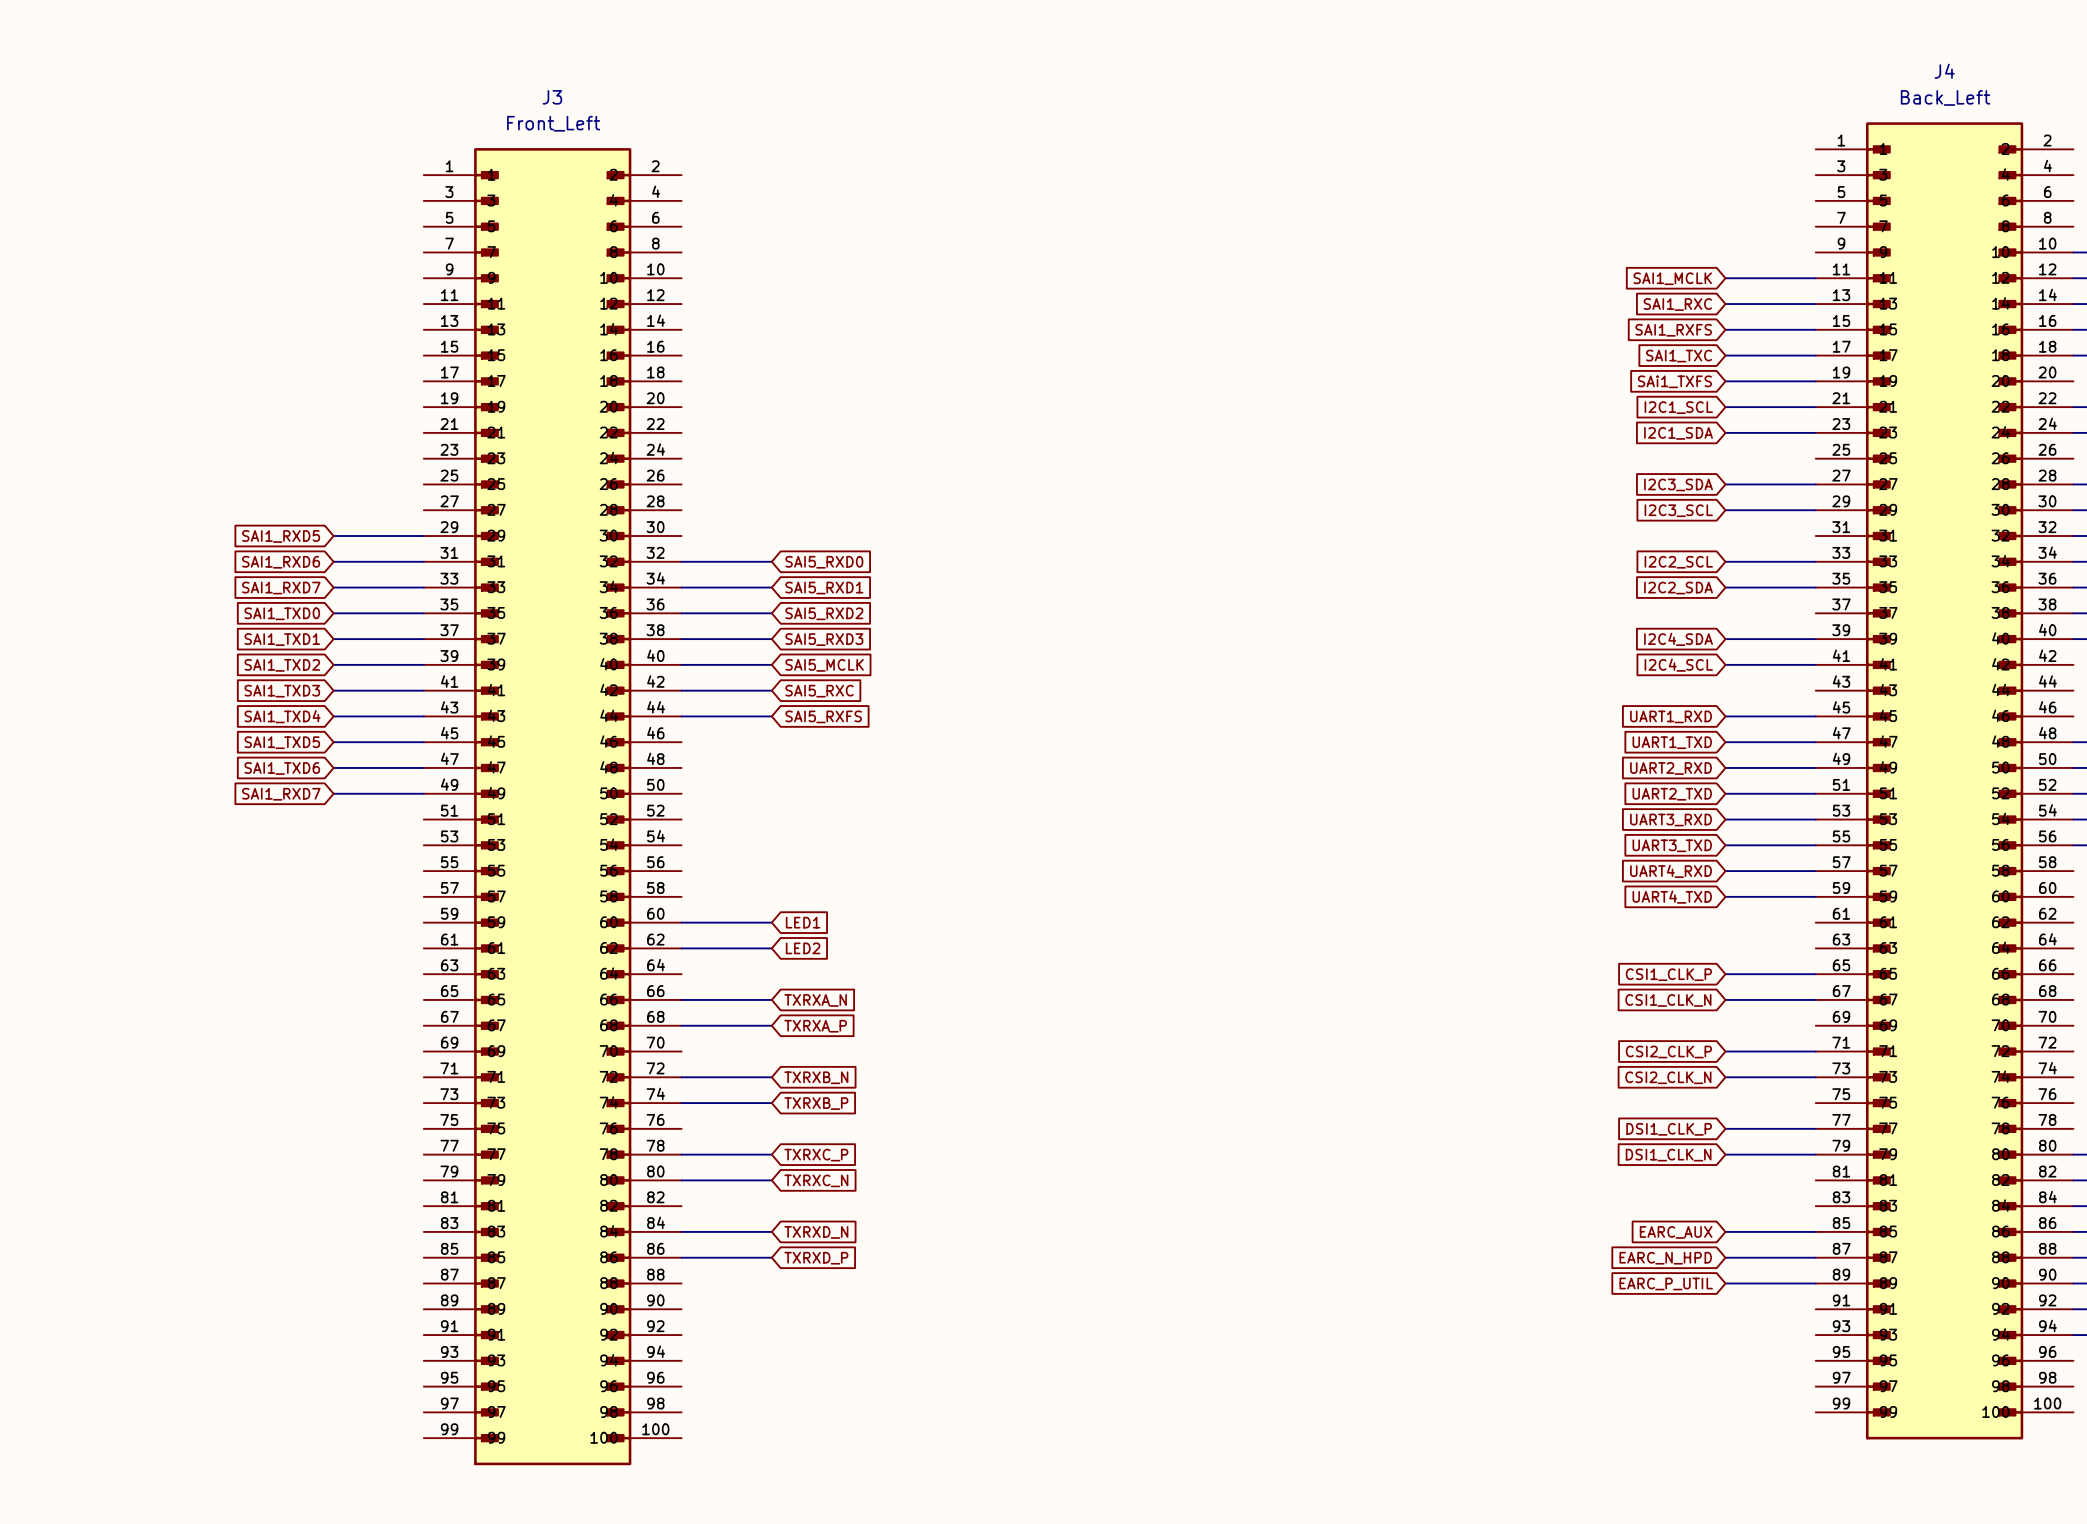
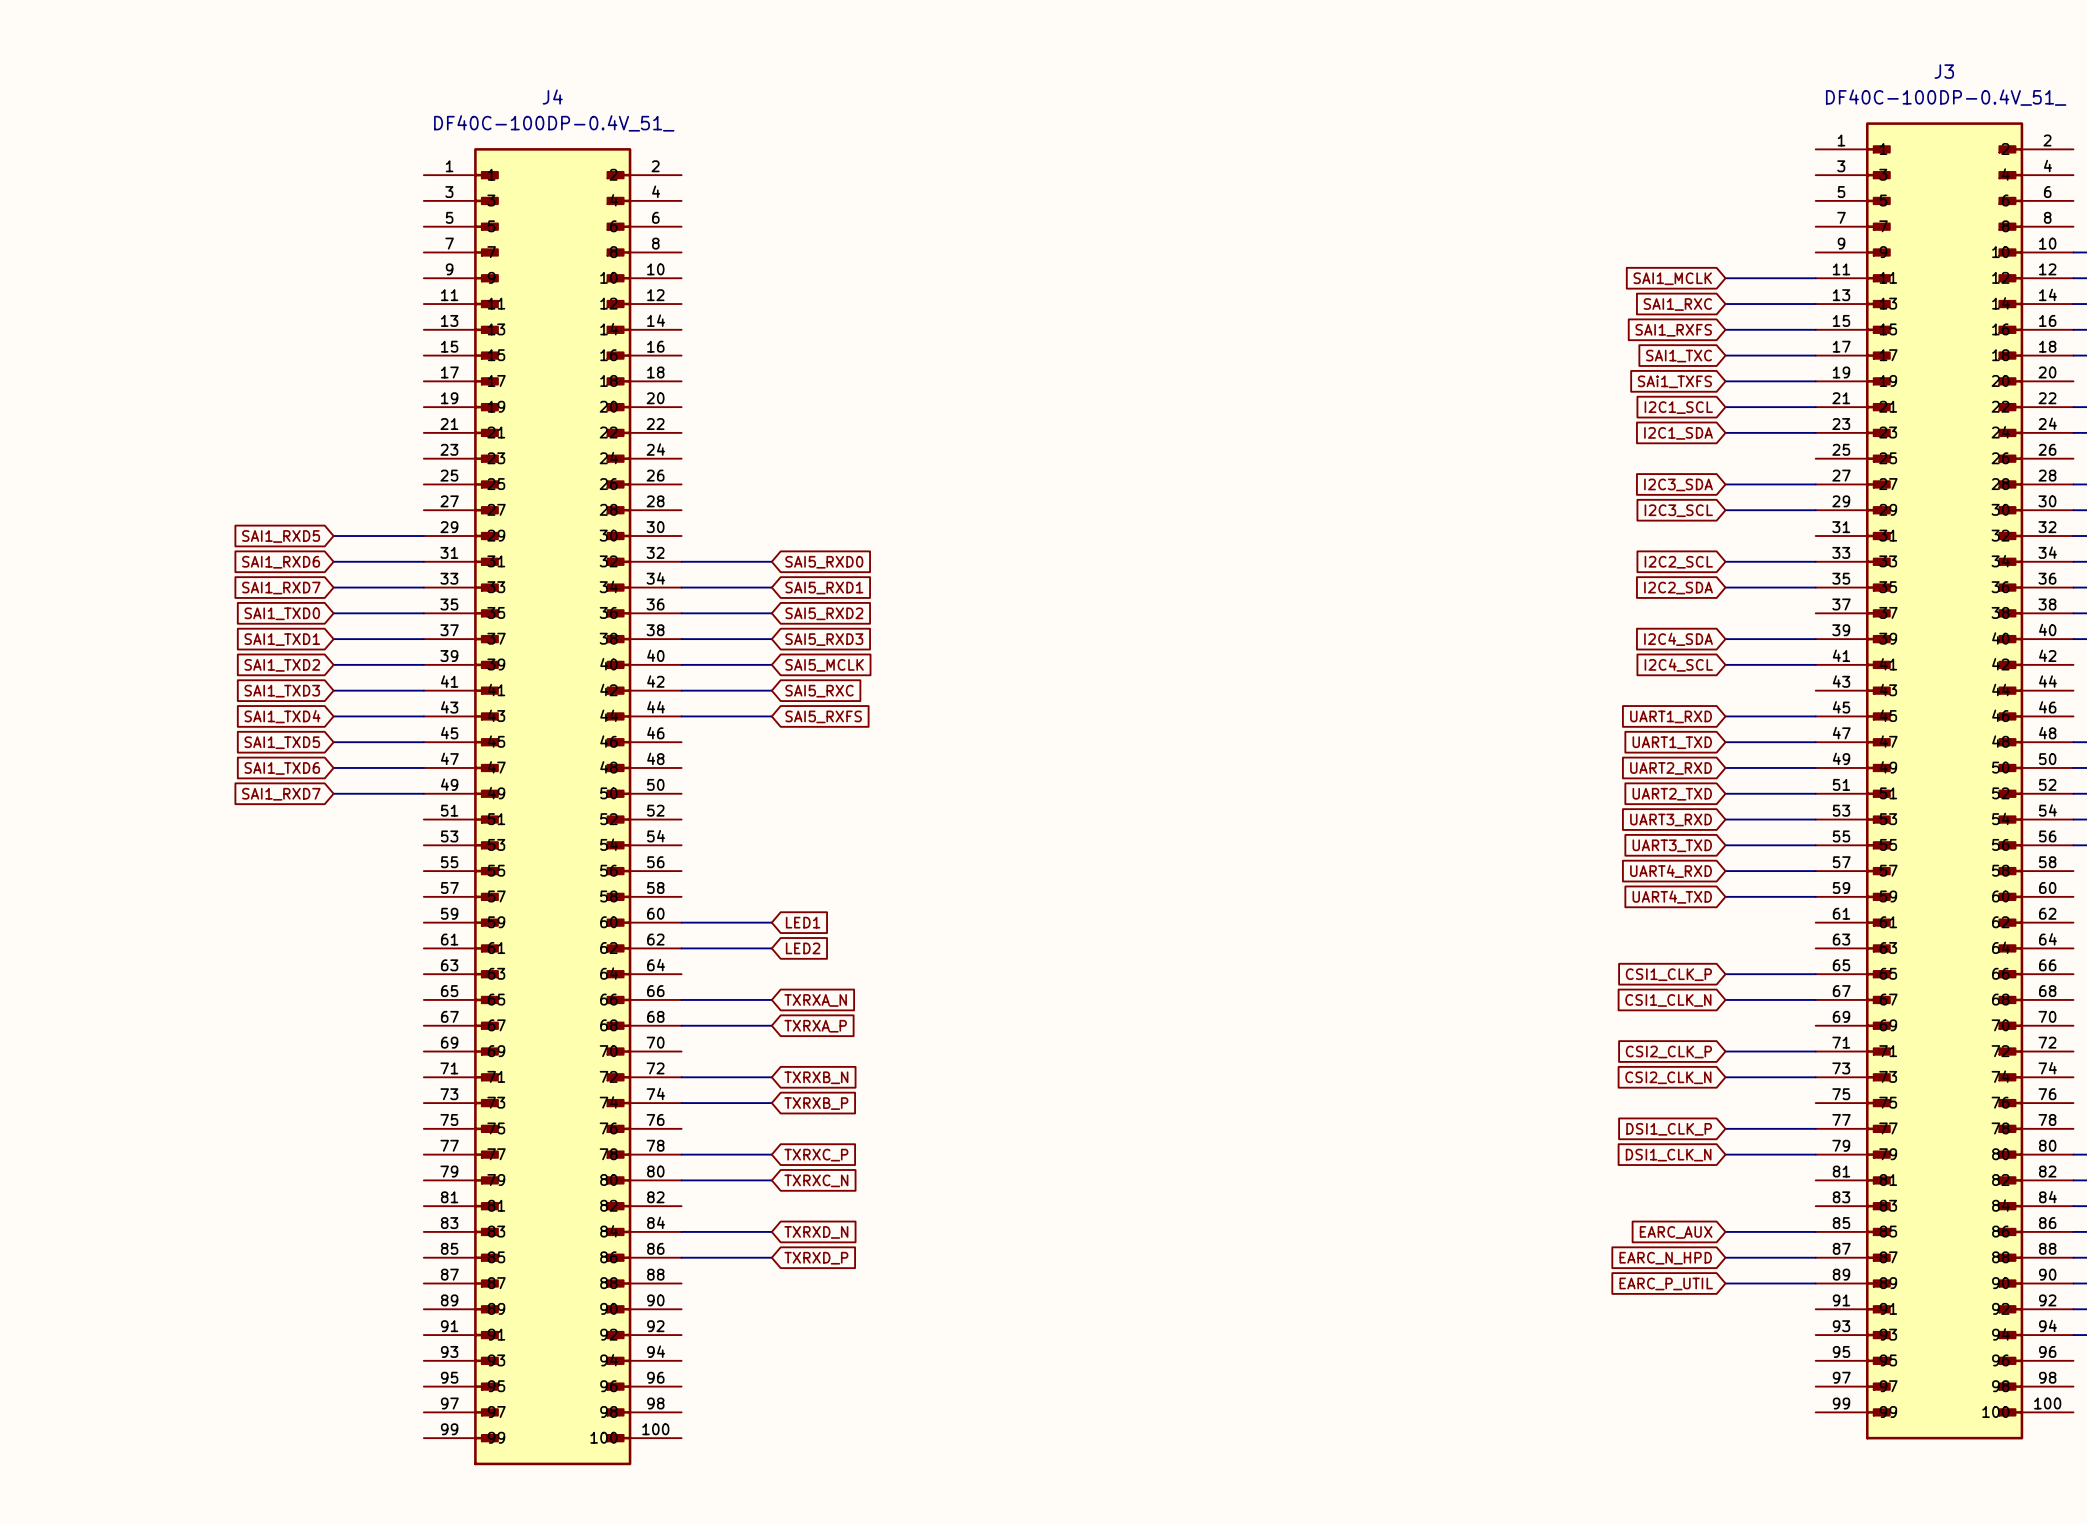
J4 name: J4 (1944, 71) -> J3 (1944, 71)
J3 name: J3 (552, 97) -> J4 (552, 97)
J4 value: Back_Left (1945, 97) -> DF40C-100DP-0.4V_51_ (1946, 97)
J3 value: Front_Left (553, 123) -> DF40C-100DP-0.4V_51_ (554, 123)

